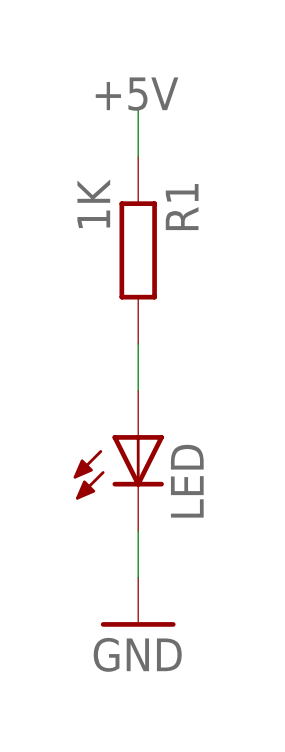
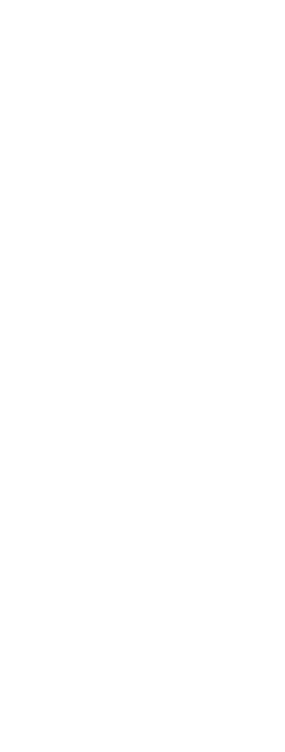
label: +5V (137, 94) -> none
wire: (138, 110) (138, 156) -> none
R1: 1K (138, 250) -> none
wire: (138, 343) (138, 390) -> none
LED: (118, 460) -> none
wire: (138, 530) (138, 577) -> none
power symbol: GND (138, 602) -> none

